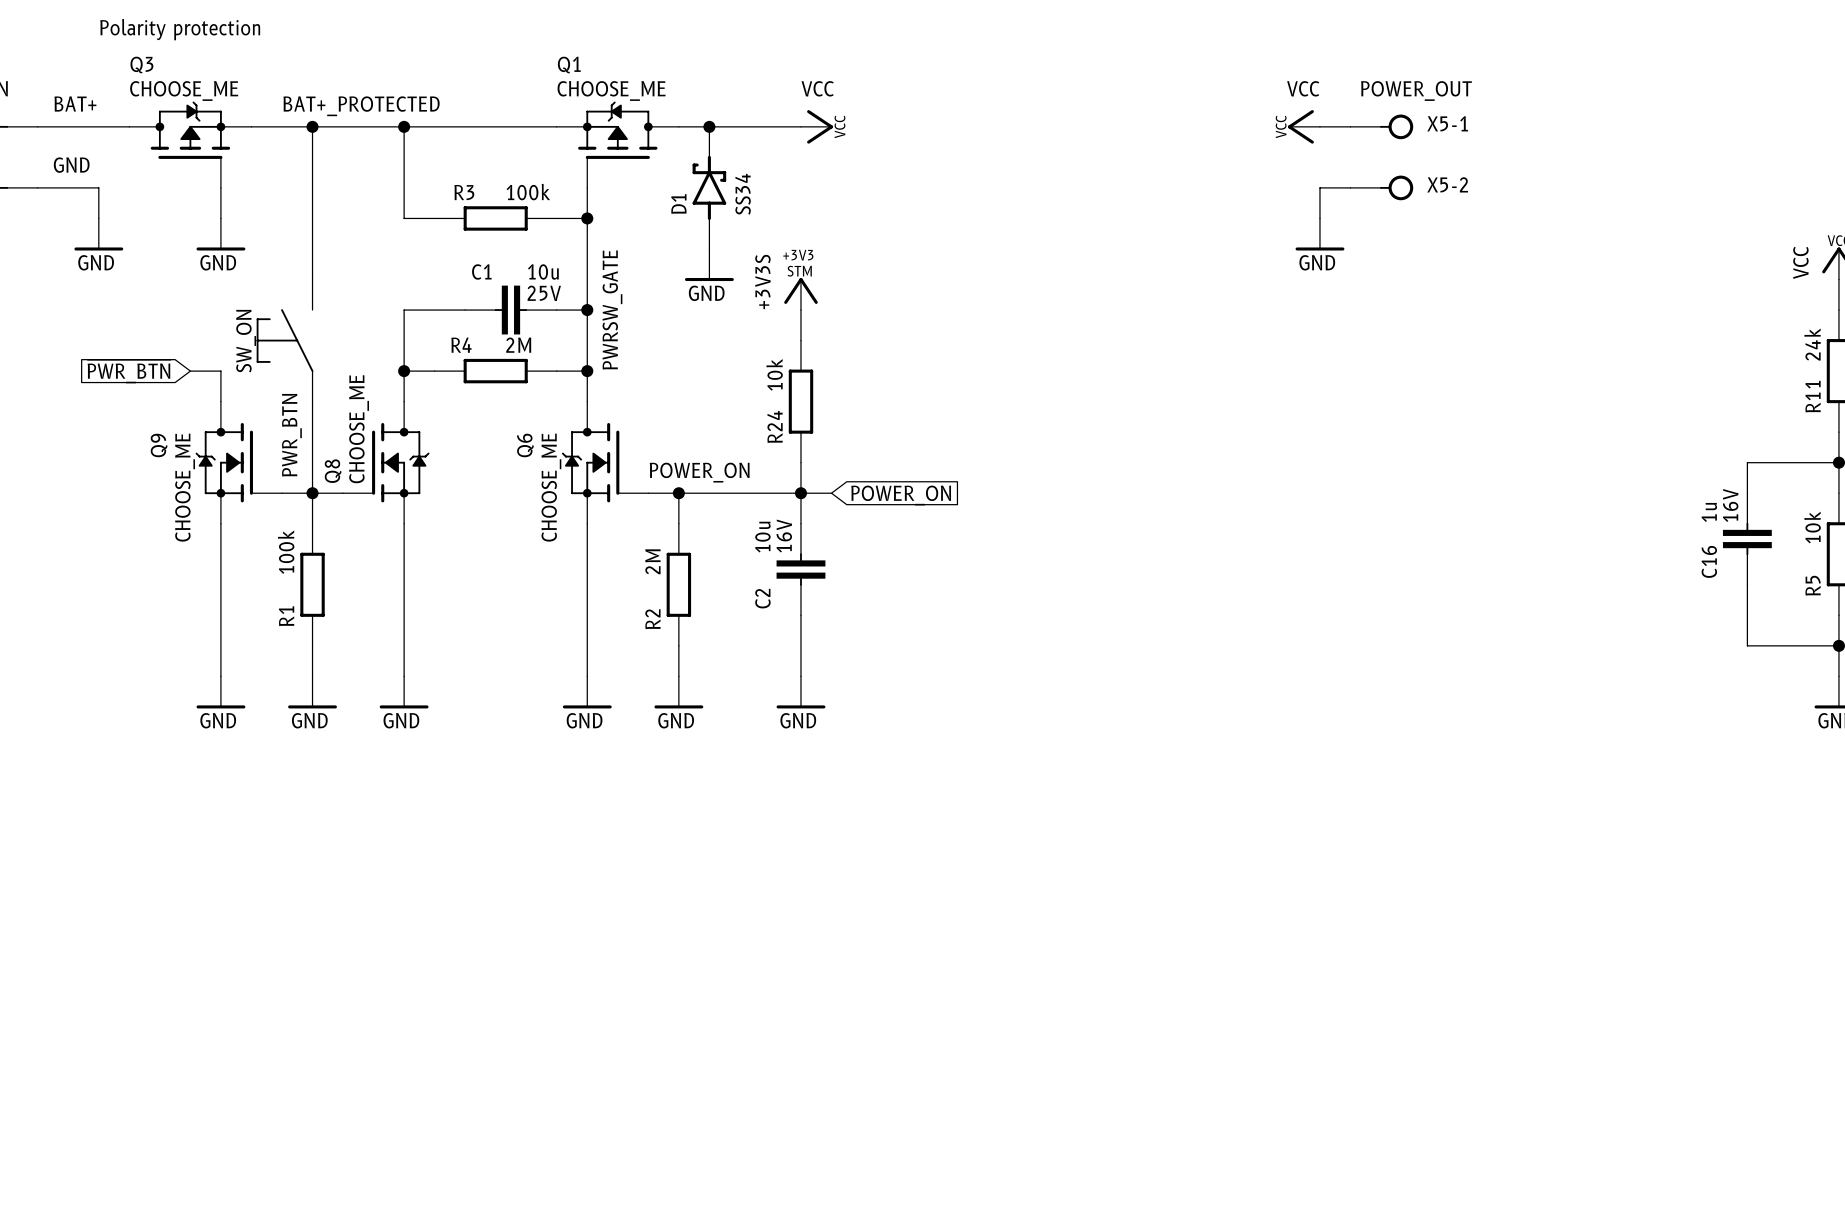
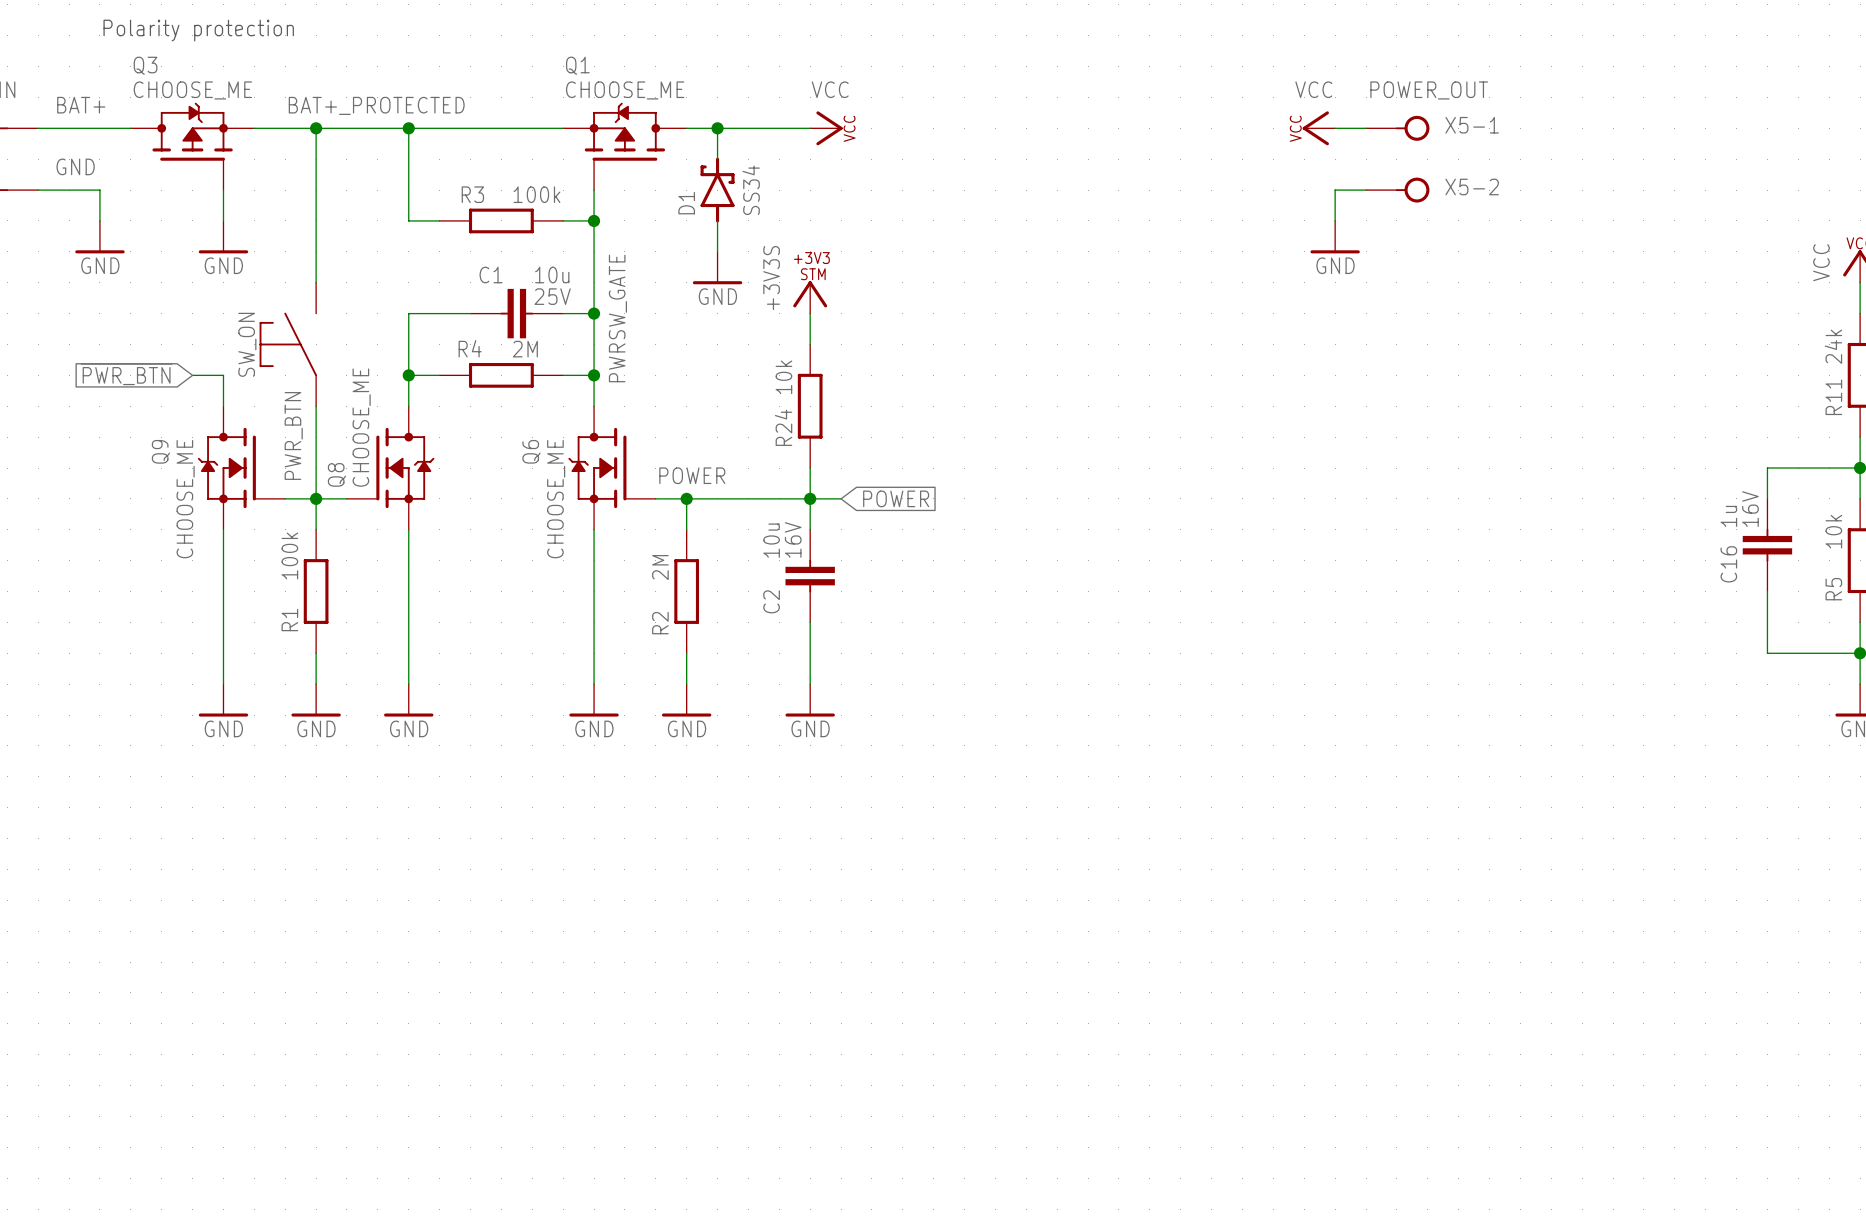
label: POWER_ON (699, 472) -> POWER (692, 475)
global label: POWER_ON (901, 495) -> POWER (896, 498)

